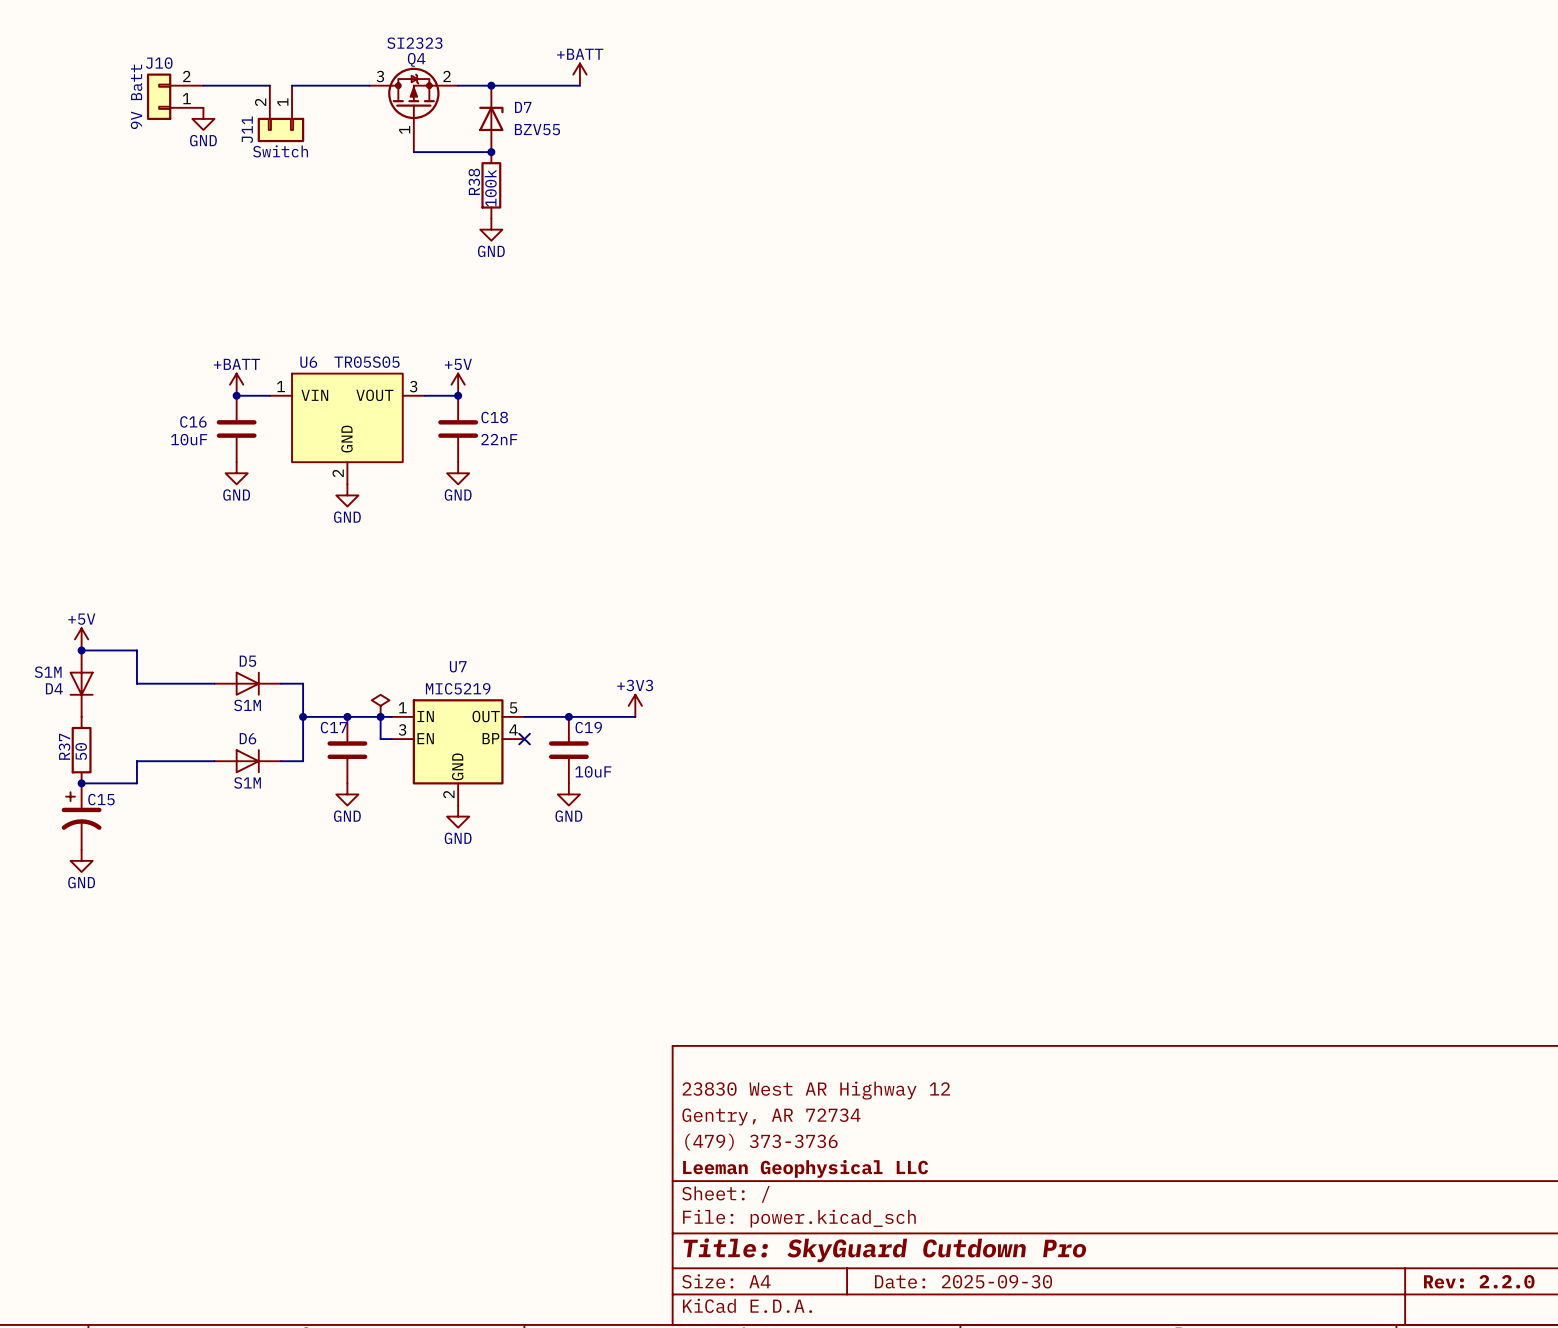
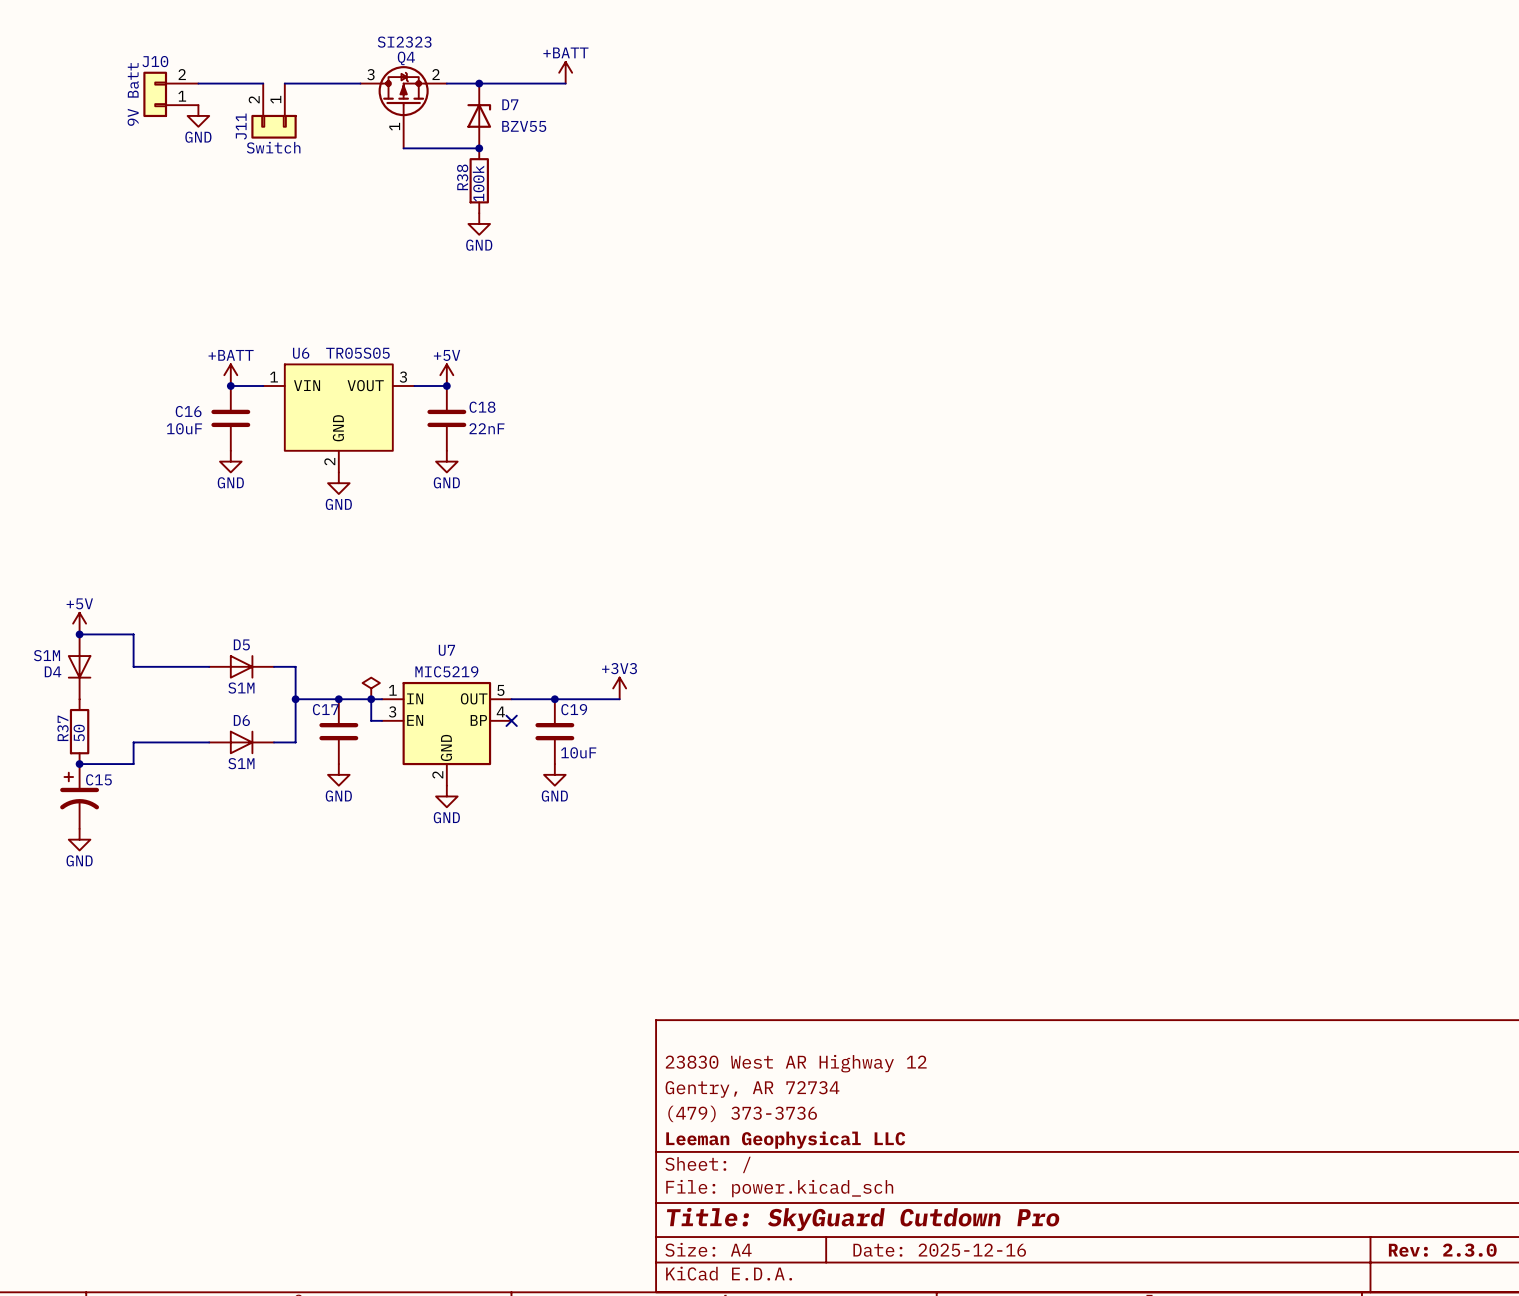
title block: Date: 2025-09-30 (963, 1281) -> Date: 2025-12-16 (939, 1250)
title block: Rev: 2.2.0 (1479, 1281) -> Rev: 2.3.0 (1442, 1250)

